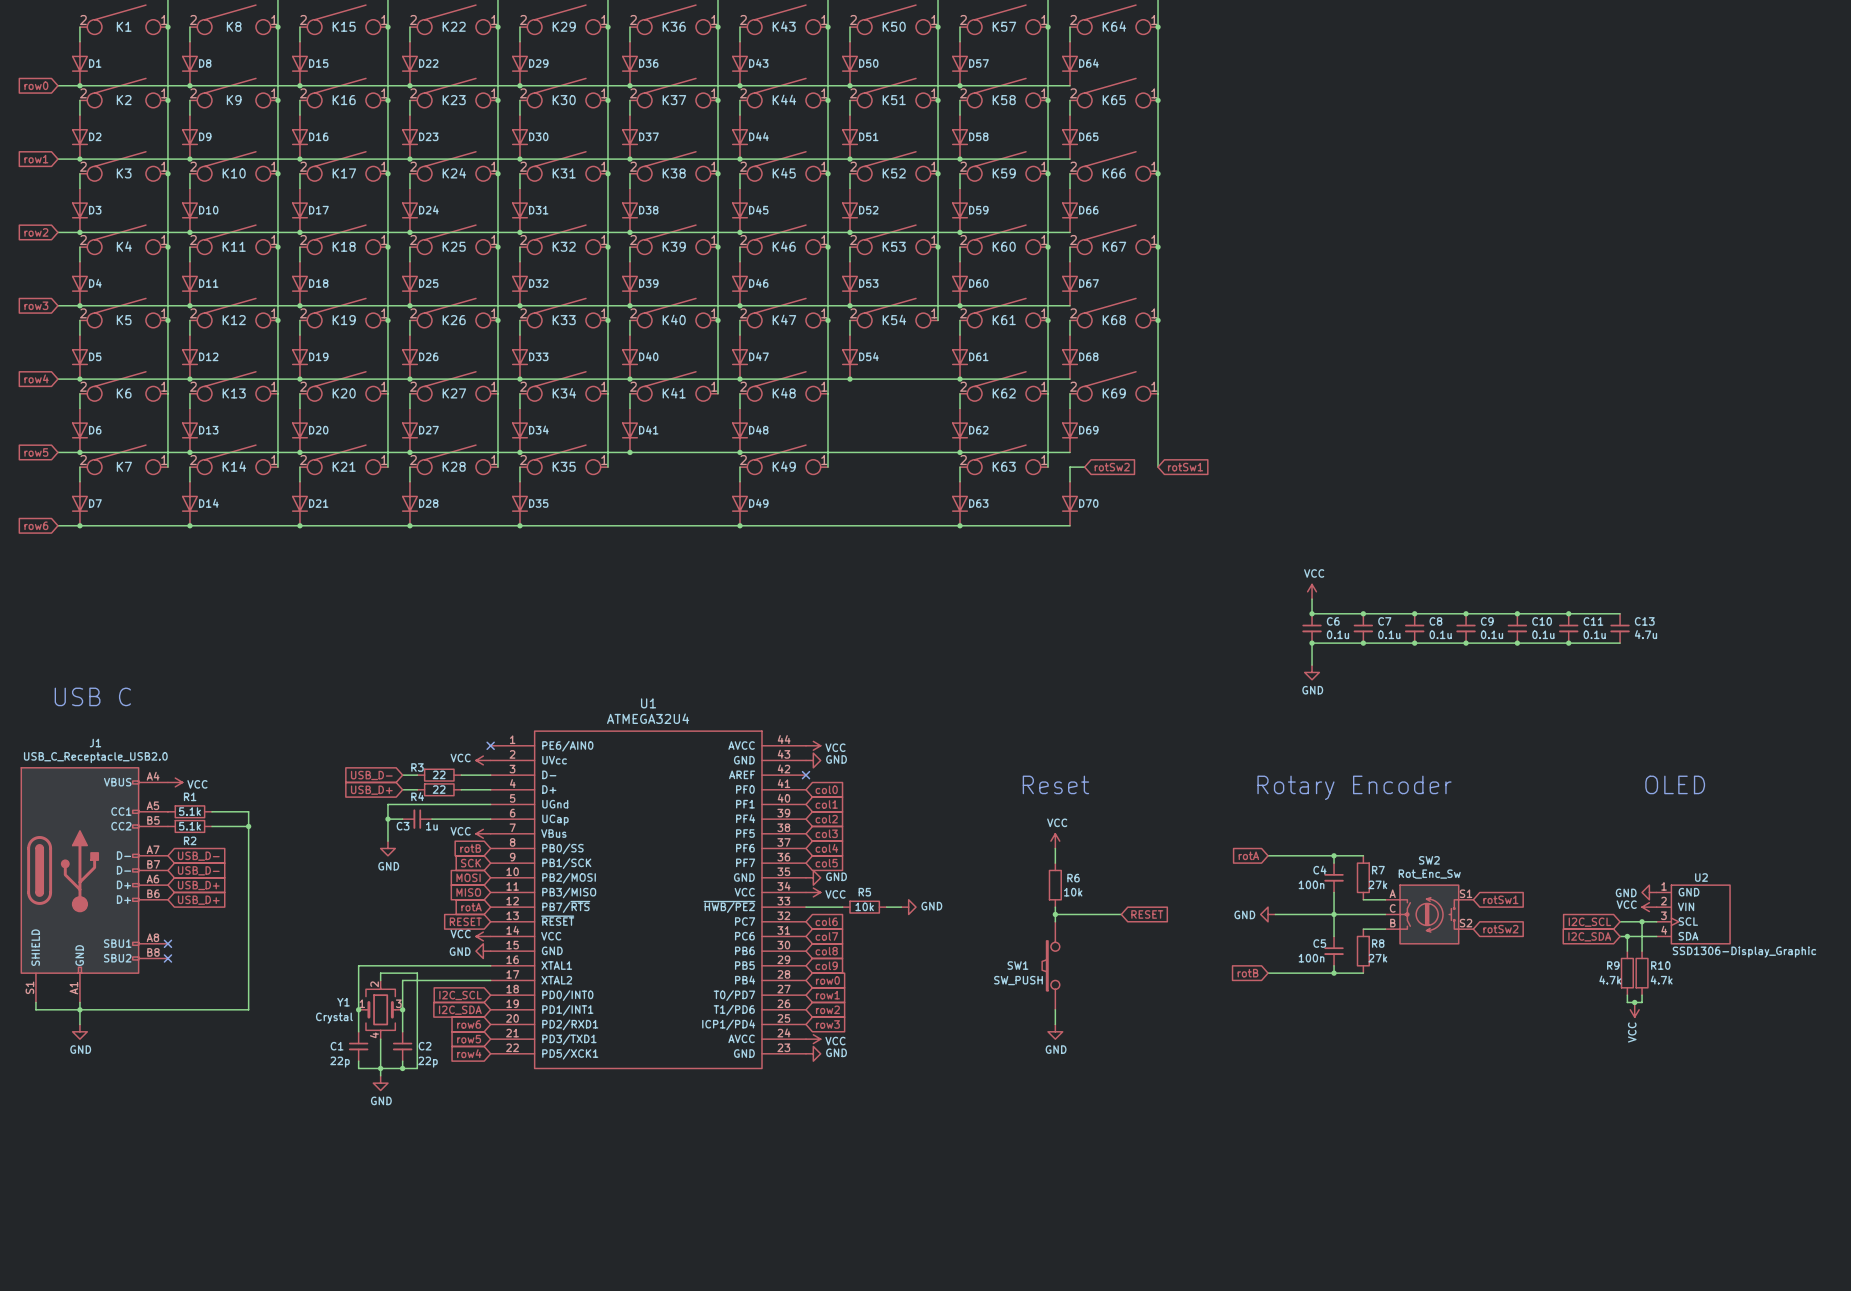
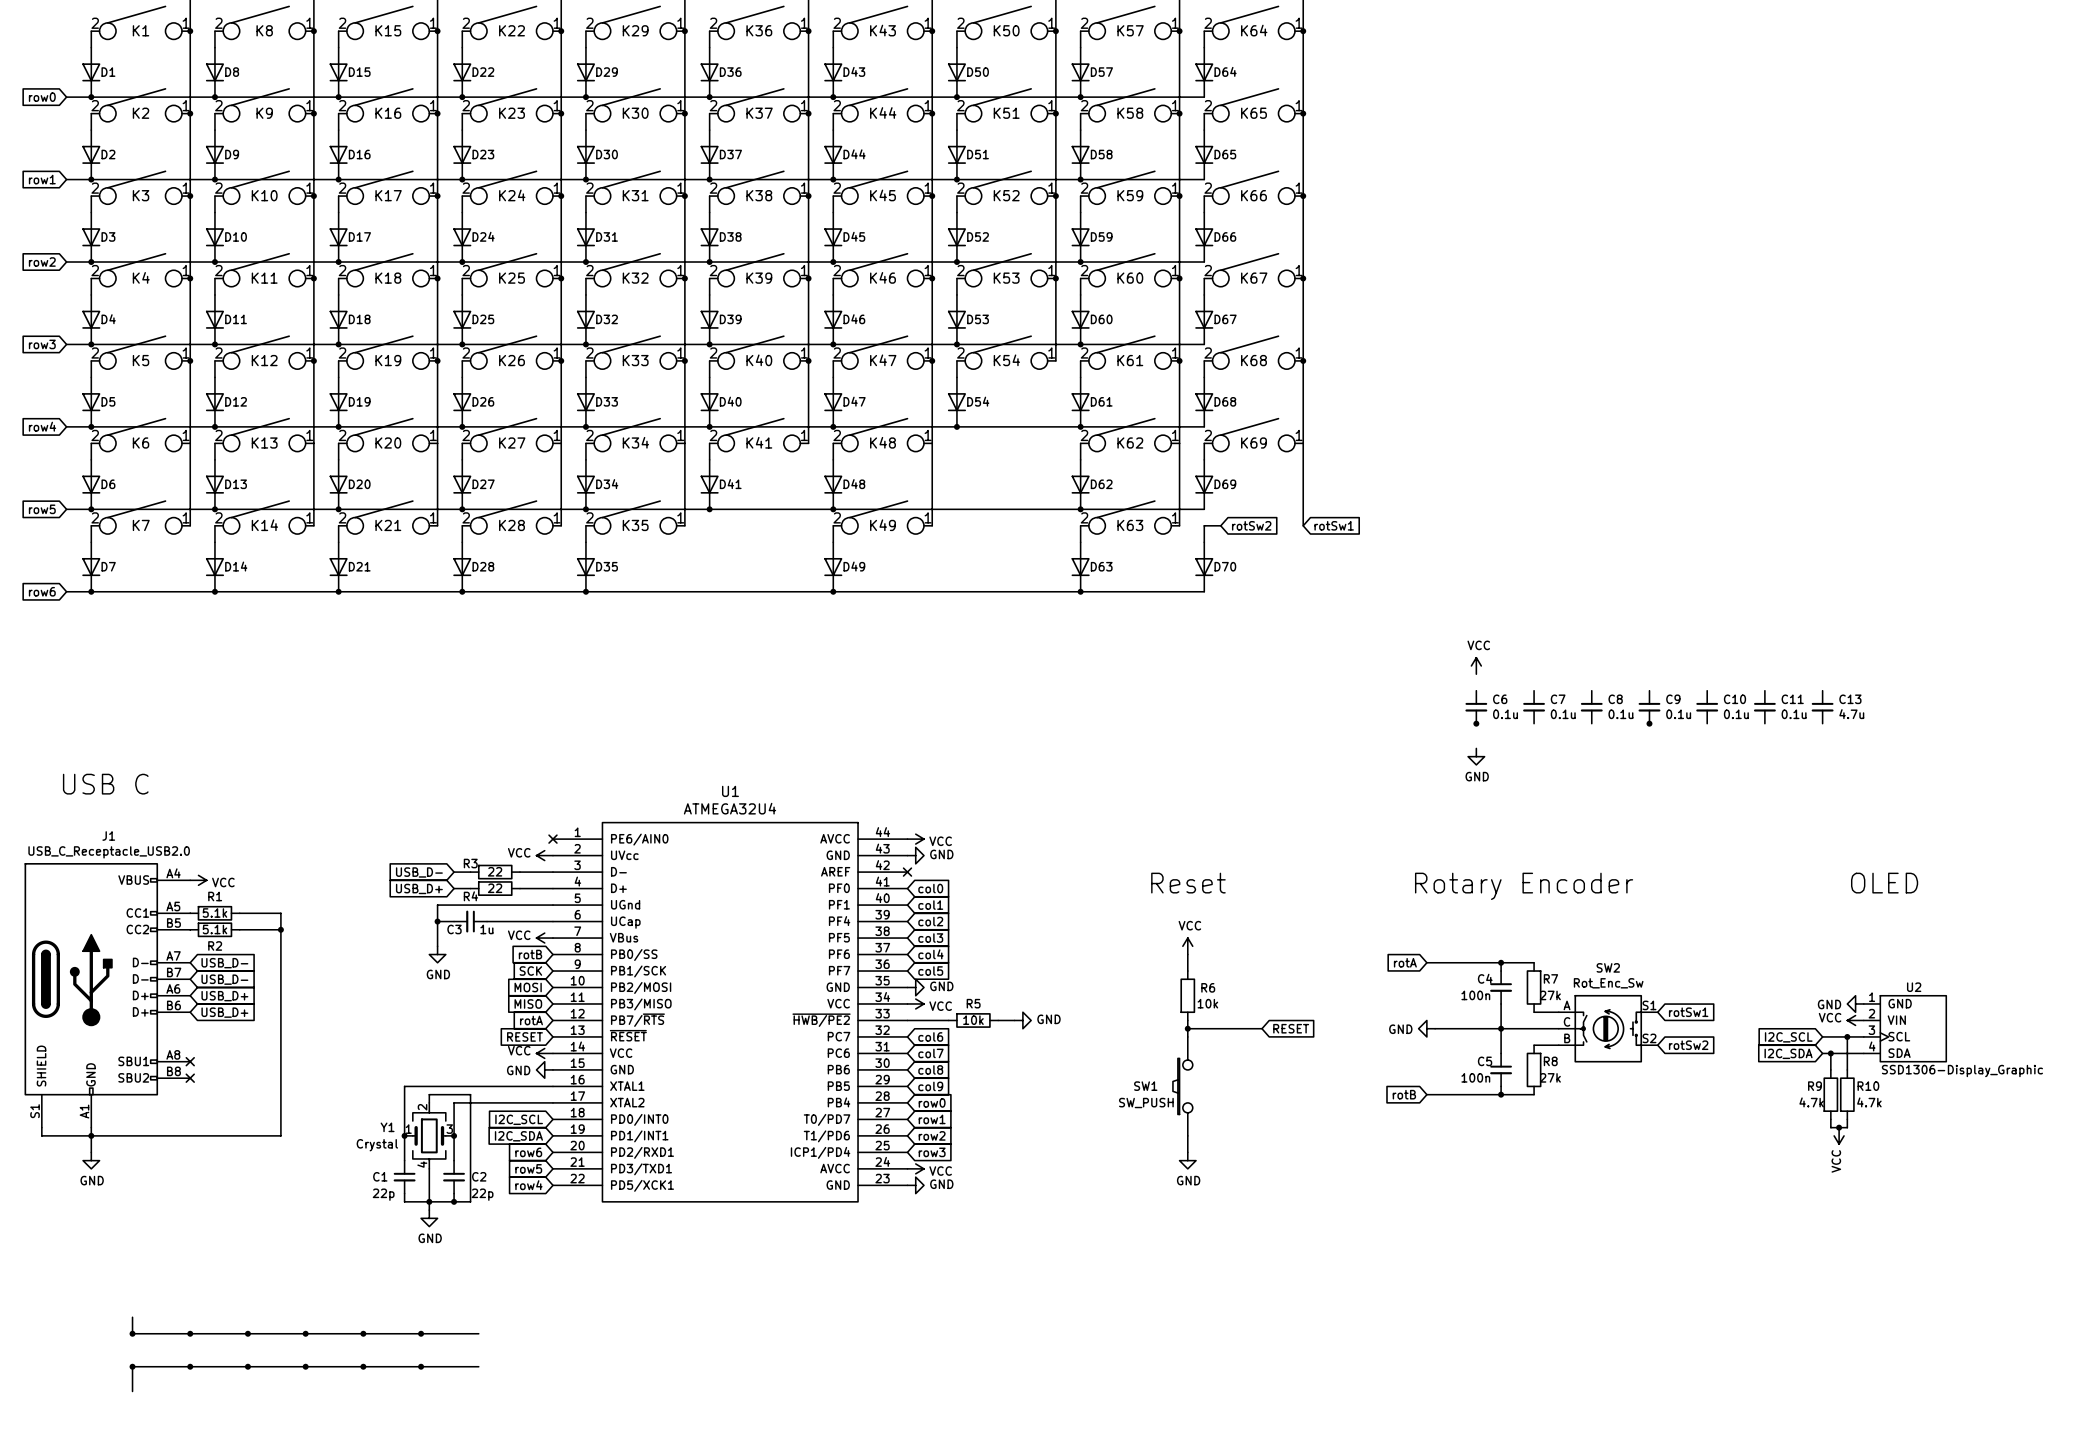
wire: (1312, 599) (1312, 613) (1620, 613) -> none
junction: (1312, 613) -> none
junction: (1363, 613) -> none
junction: (1414, 613) -> none
junction: (1466, 613) -> none
junction: (1517, 613) -> none
junction: (1568, 613) -> none
junction: (1363, 643) -> none
junction: (1414, 643) -> none
junction: (1517, 643) -> none
junction: (1568, 643) -> none
wire: (1620, 643) (1312, 643) (1312, 665) -> none
wire: none -> (132, 1317) (132, 1333) (478, 1333)
junction: none -> (132, 1333)
junction: none -> (190, 1333)
junction: none -> (247, 1333)
junction: none -> (305, 1333)
junction: none -> (363, 1333)
junction: none -> (421, 1333)
junction: none -> (132, 1366)
junction: none -> (190, 1366)
junction: none -> (247, 1366)
junction: none -> (305, 1366)
junction: none -> (363, 1366)
junction: none -> (421, 1366)
wire: none -> (478, 1366) (132, 1366) (132, 1391)

